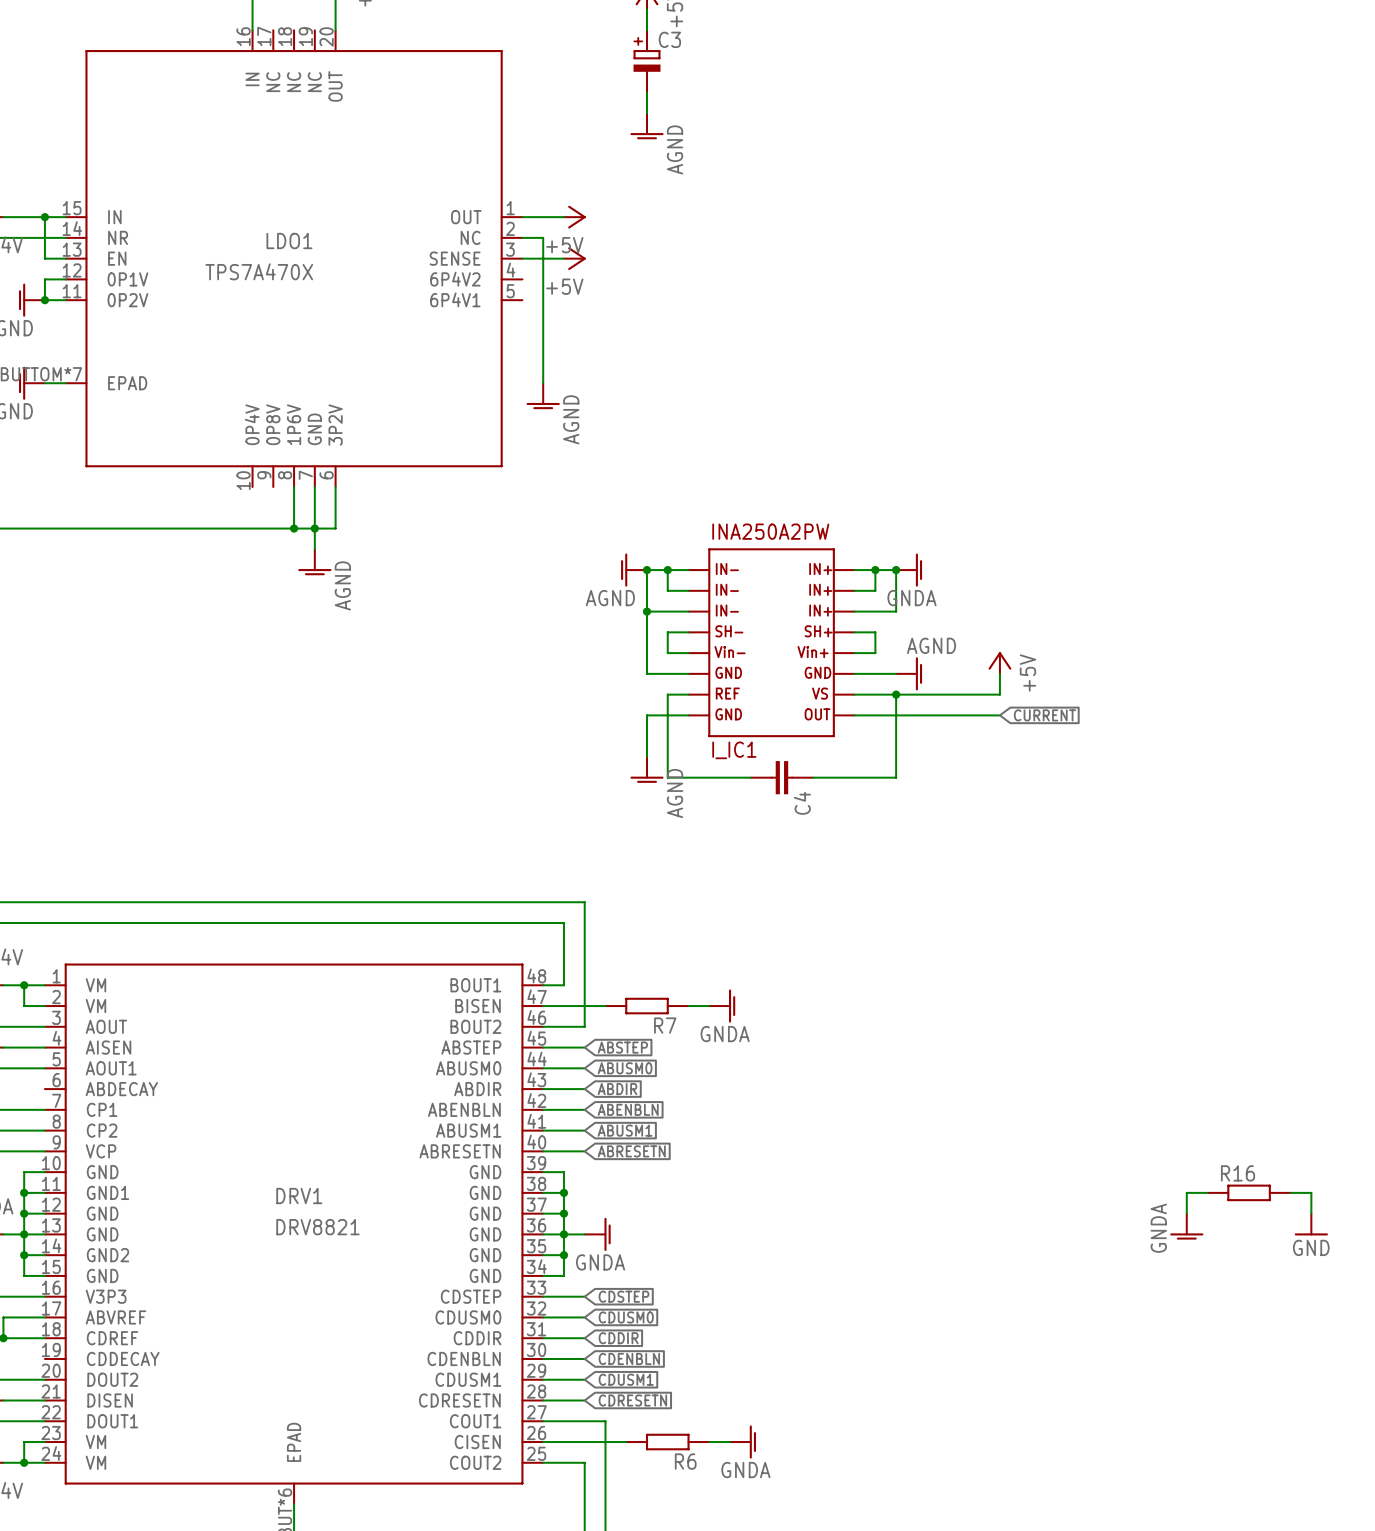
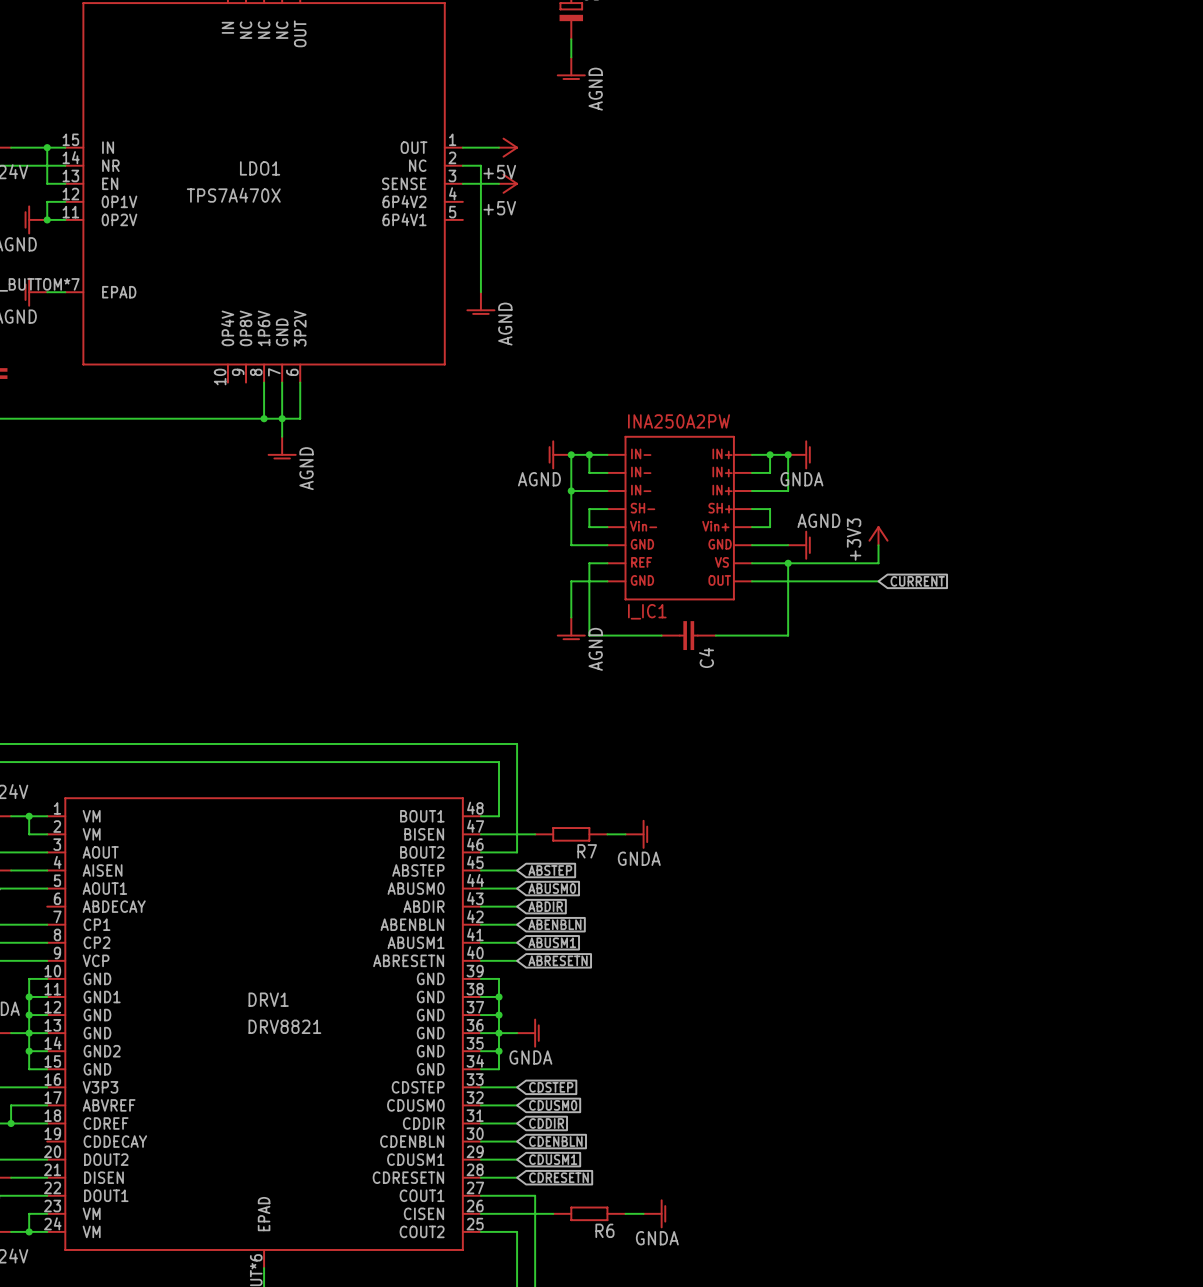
power symbol: +5V (999, 662) -> +3V3 (878, 535)
wire: (1207, 1192) (1186, 1192) (1186, 1213) -> none
R16: (1249, 1192) -> none
wire: (1290, 1192) (1311, 1192) (1311, 1213) -> none
power symbol: GND (1311, 1224) -> none
power symbol: GNDA (1186, 1226) -> none

